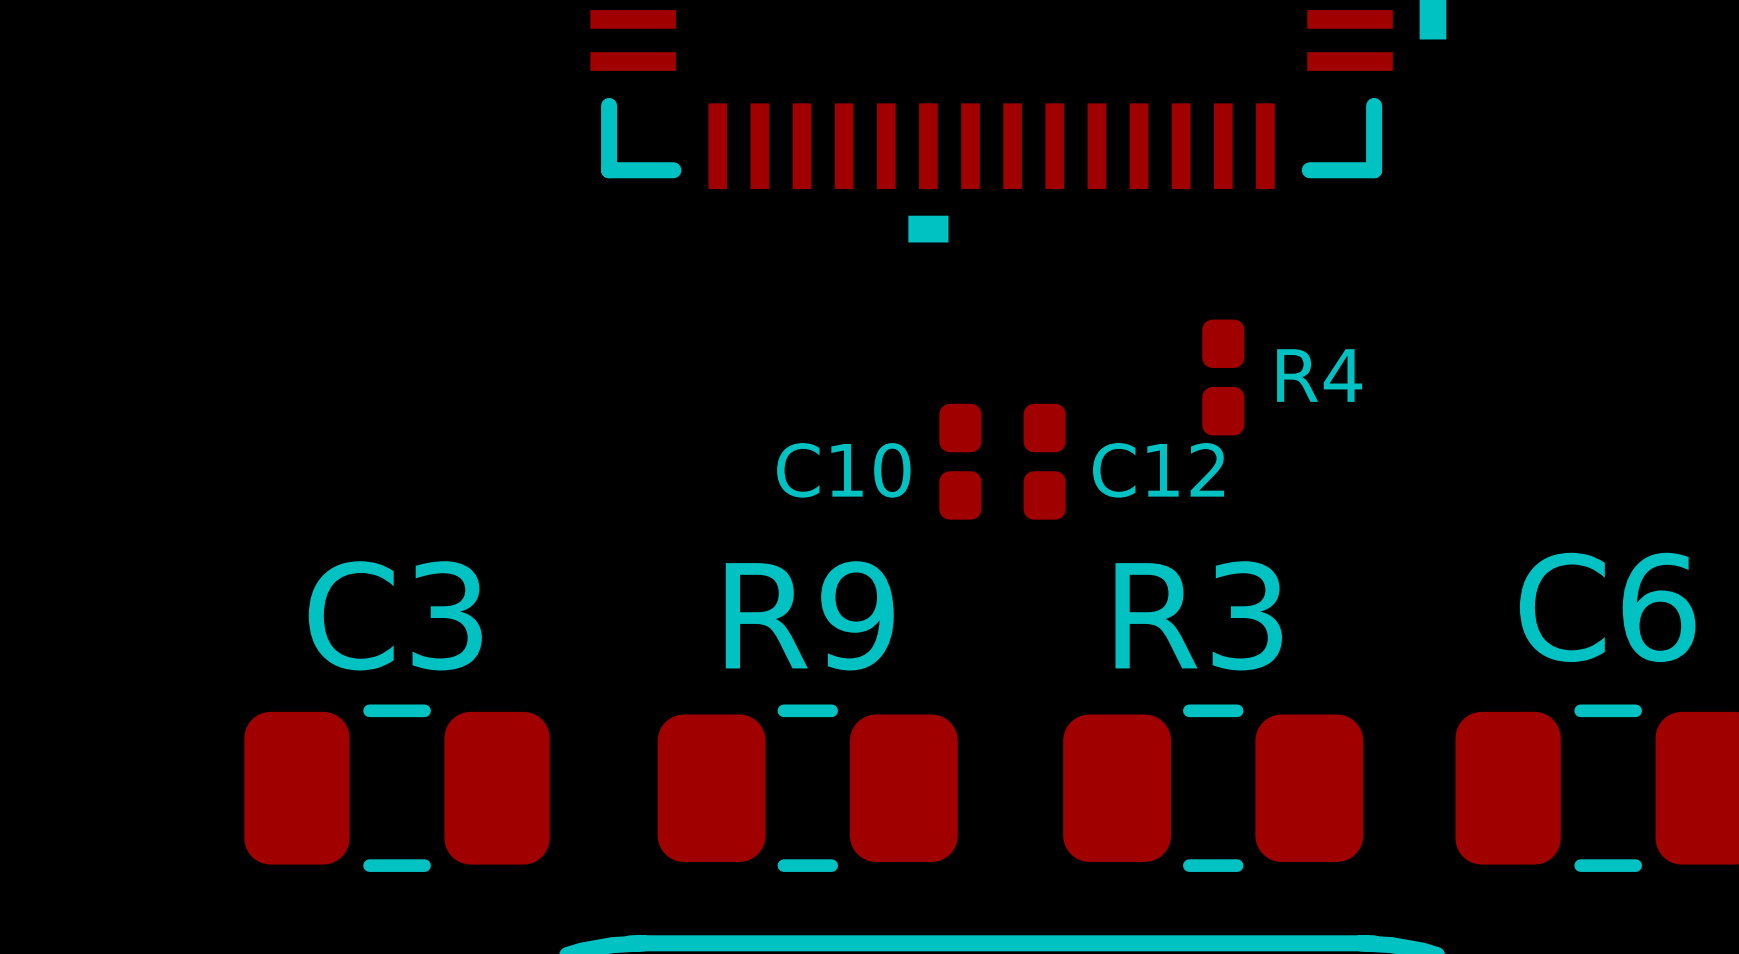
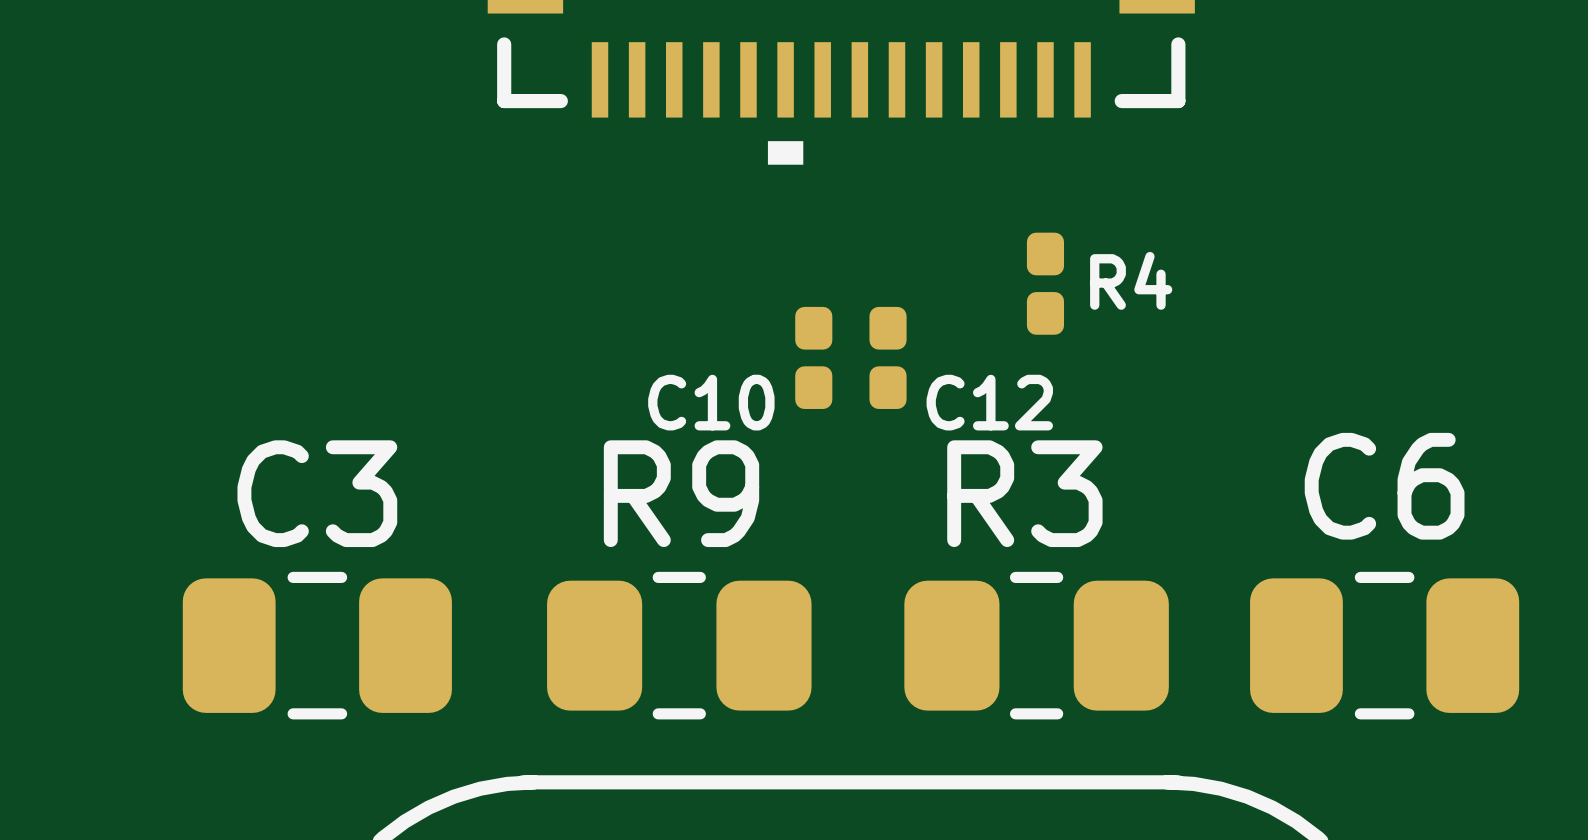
C10 name position: C10 (843, 470) -> C10 (711, 402)
C12 name position: C12 (1158, 470) -> C12 (989, 402)

